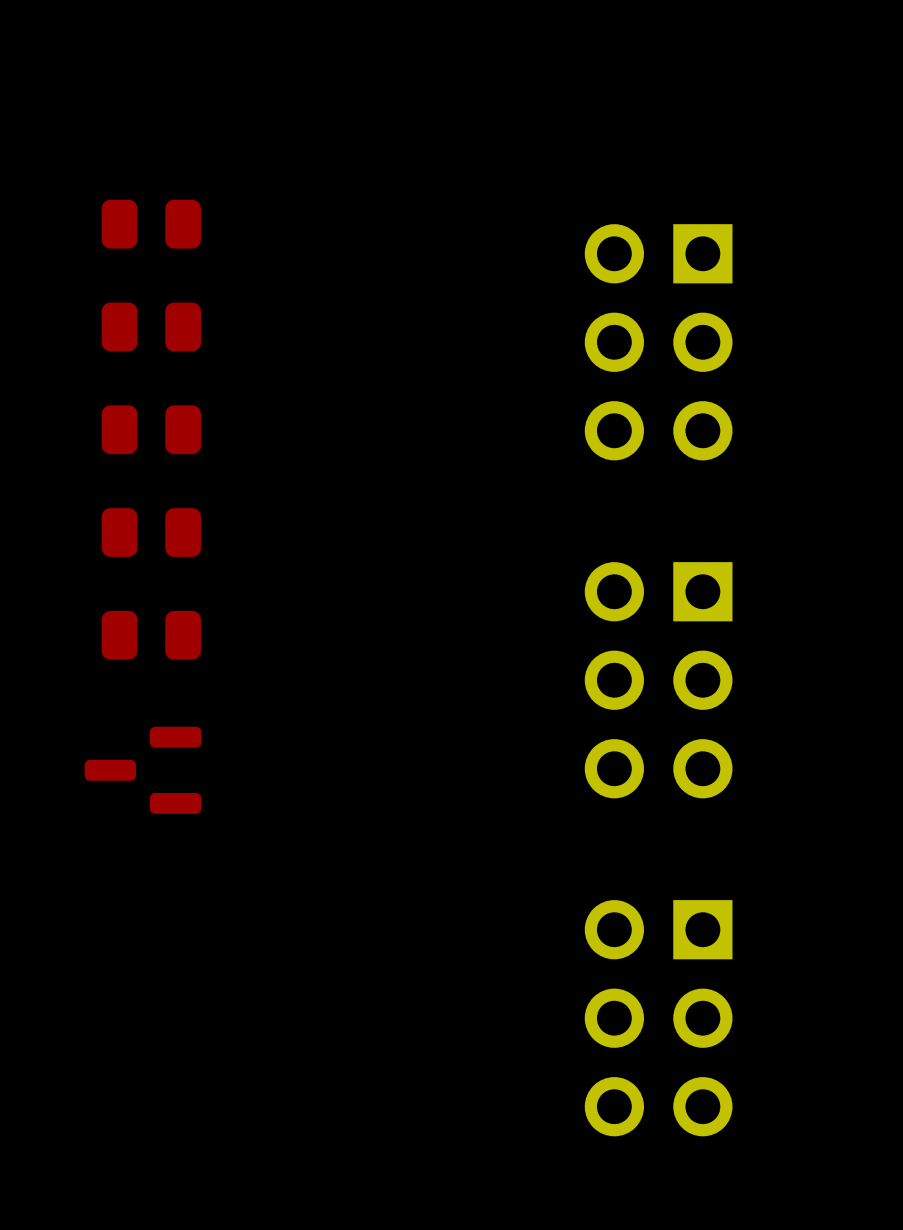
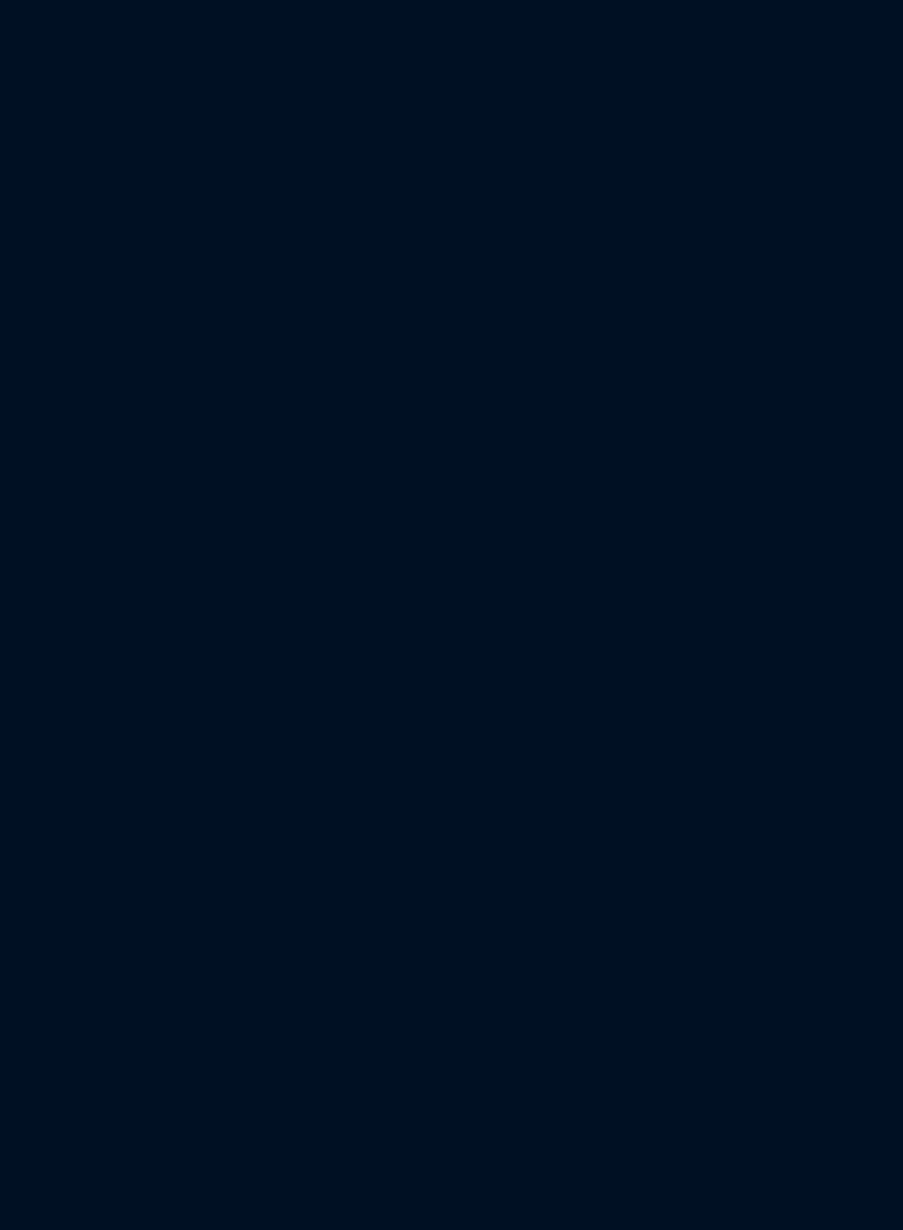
part: (151, 224) -> none
part: (151, 326) -> none
part: (658, 342) -> none
part: (151, 429) -> none
part: (151, 532) -> none
part: (151, 635) -> none
part: (658, 680) -> none
part: (142, 770) -> none
part: (658, 1018) -> none

